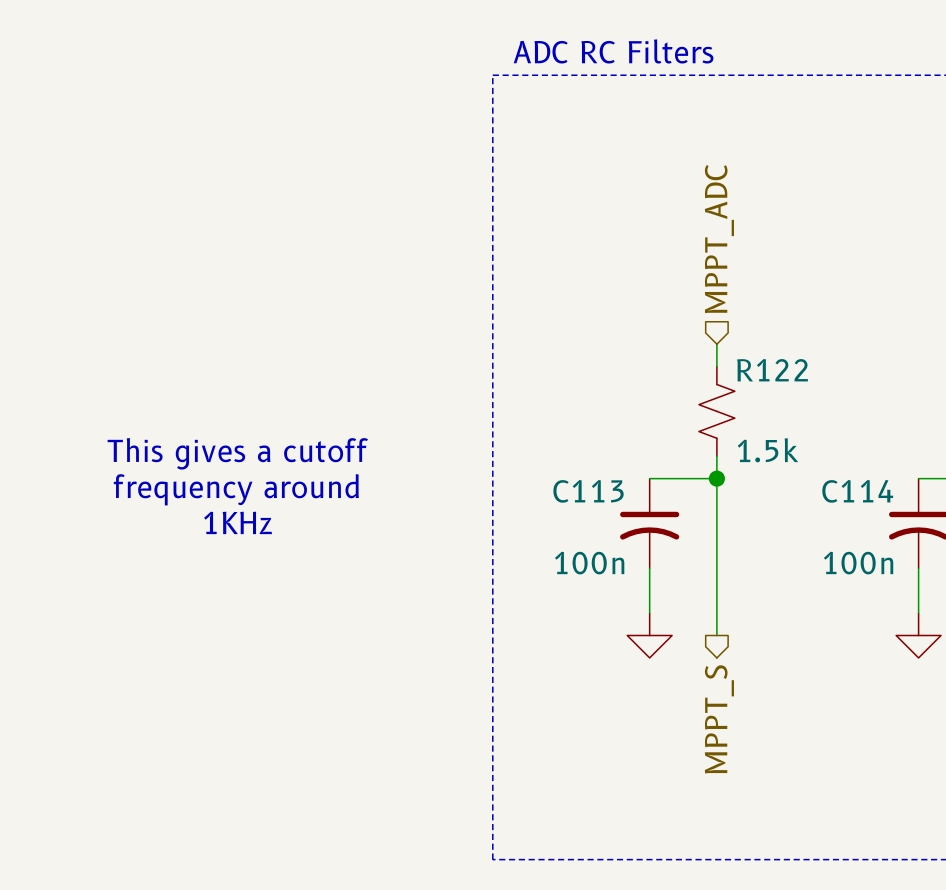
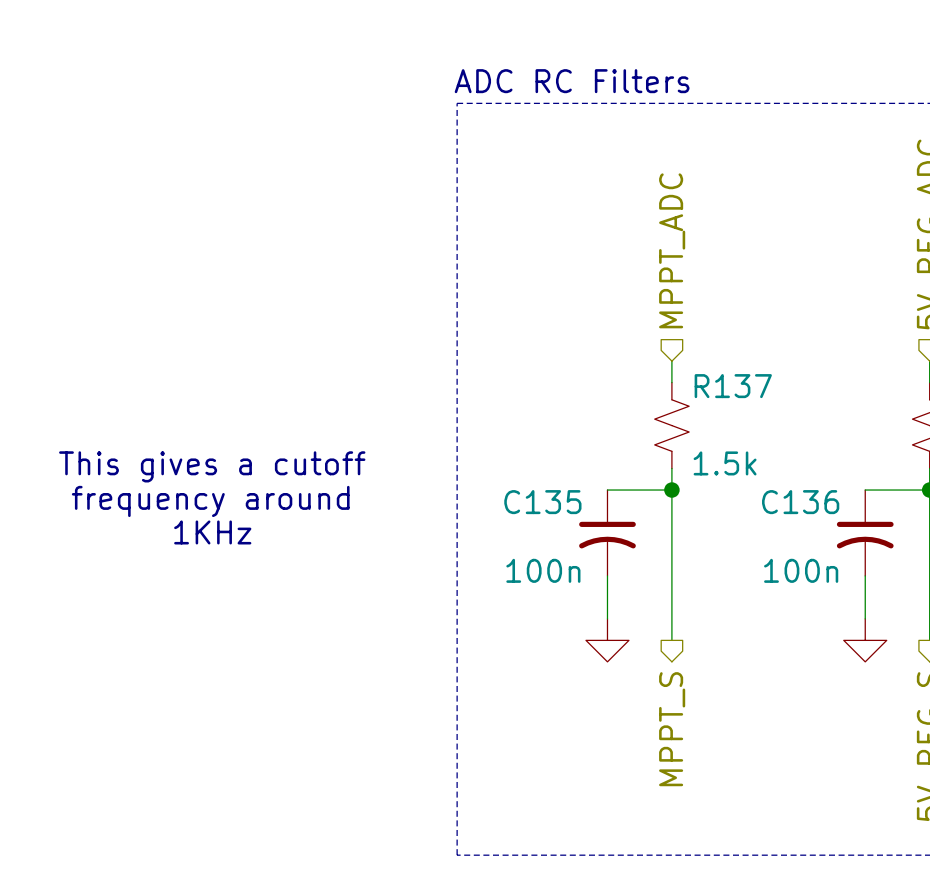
R122 name: R122 (772, 370) -> R137 (733, 386)
C113 name: C113 (588, 491) -> C135 (542, 502)
C114 name: C114 (857, 491) -> C136 (800, 502)

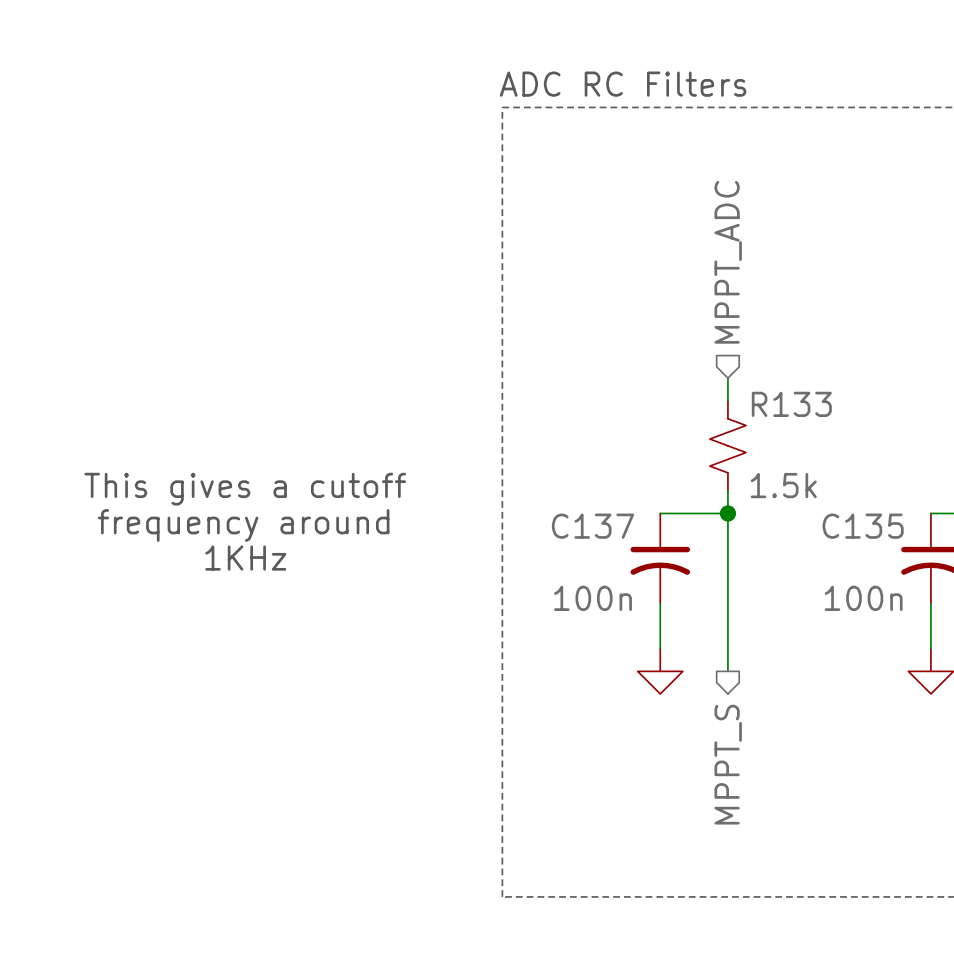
R137 name: R137 (733, 386) -> R133 (791, 404)
C135 name: C135 (542, 502) -> C137 (592, 526)
C136 name: C136 (800, 502) -> C135 (863, 526)

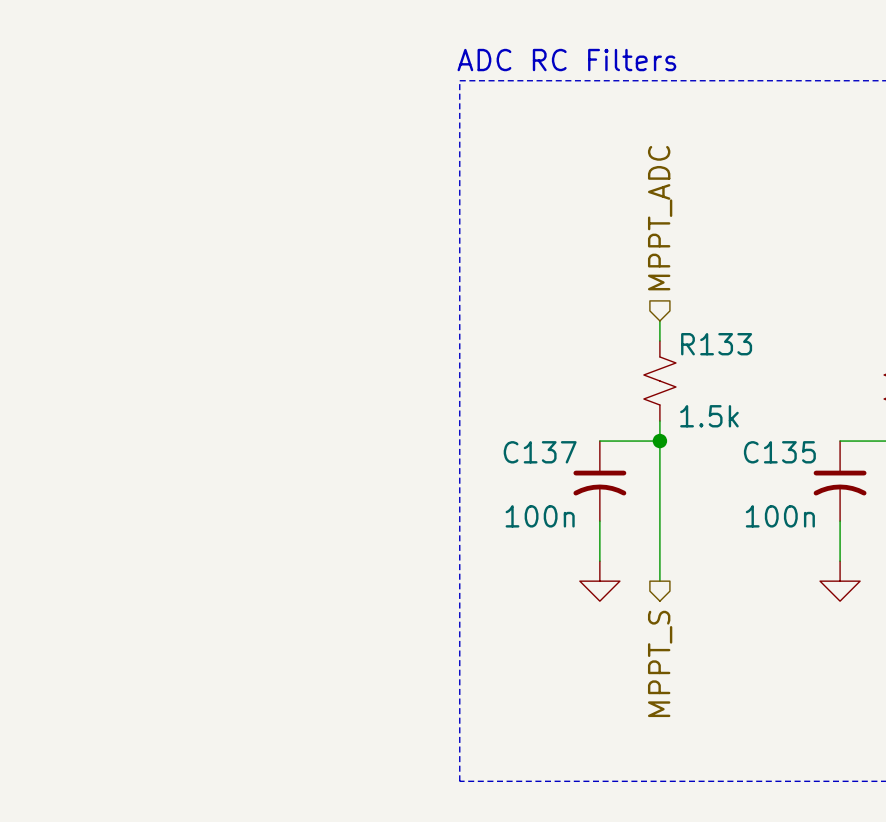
text: This gives a cutoff (245, 489) -> none
text: frequency around (243, 525) -> none
text: 1KHz (245, 558) -> none

